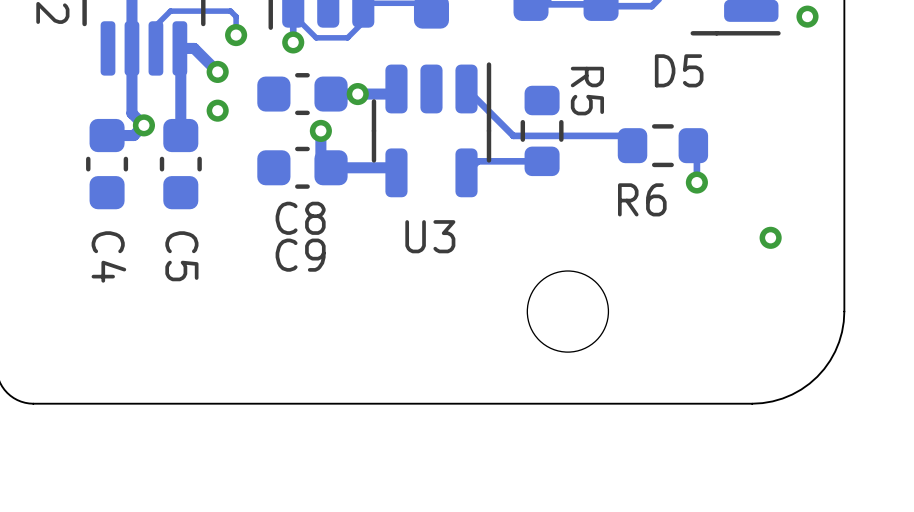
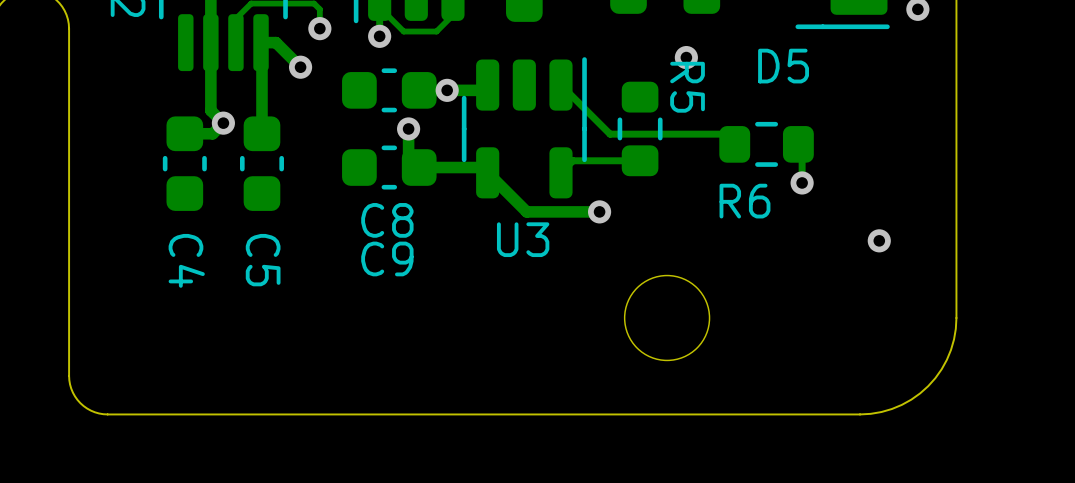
via: none -> (686, 57)
via: (217, 110) -> none
track: none -> (487, 172) (526, 211) (599, 211)
via: none -> (599, 211)

